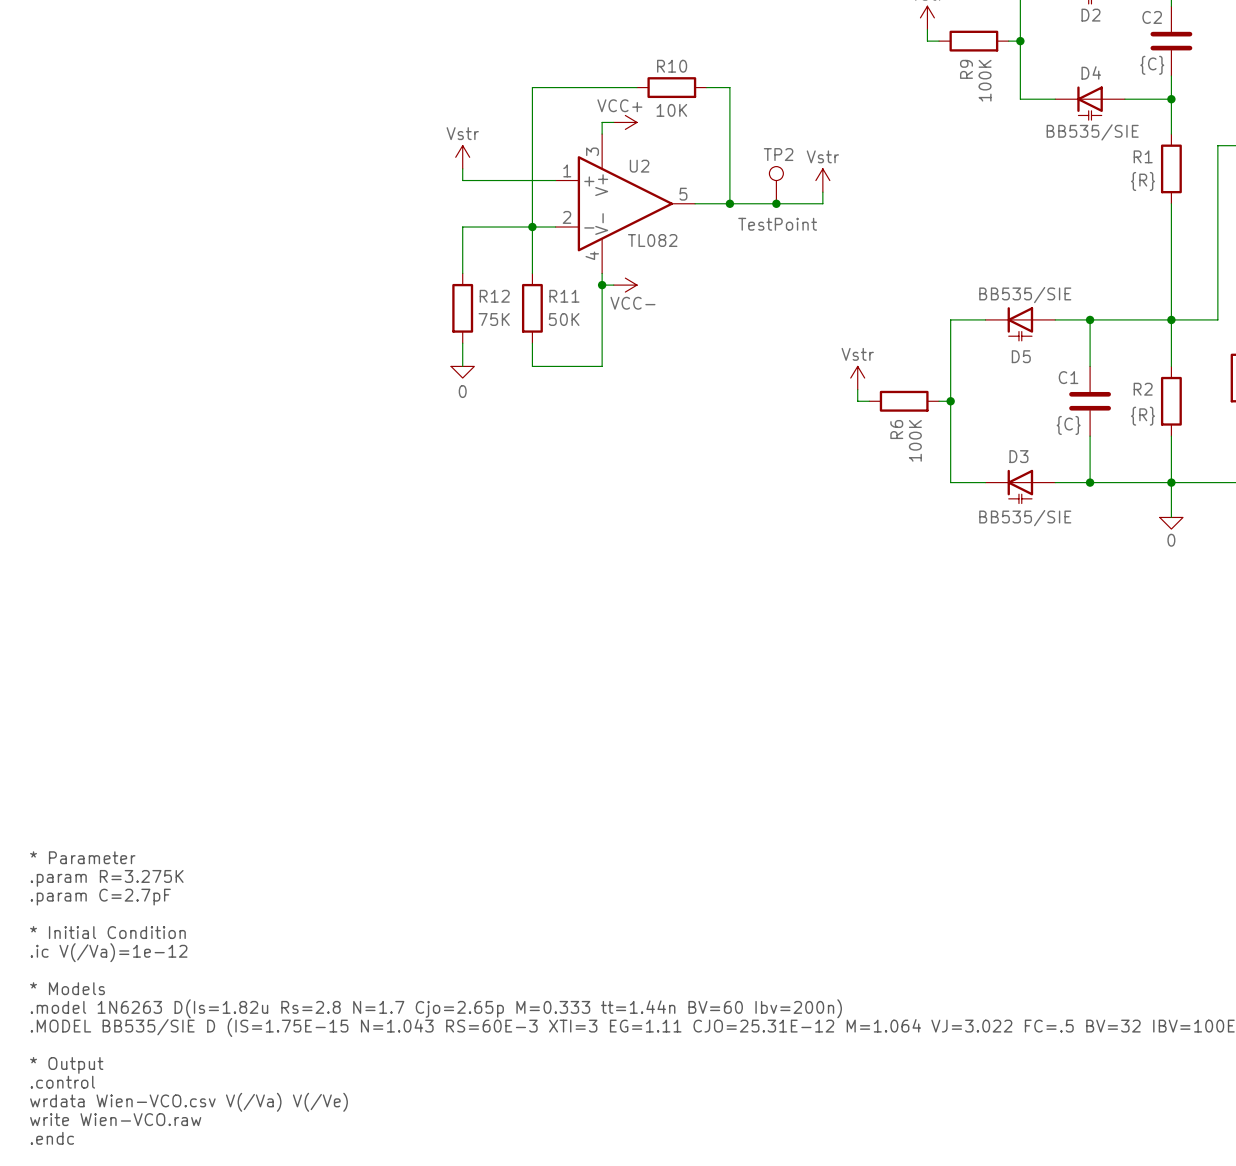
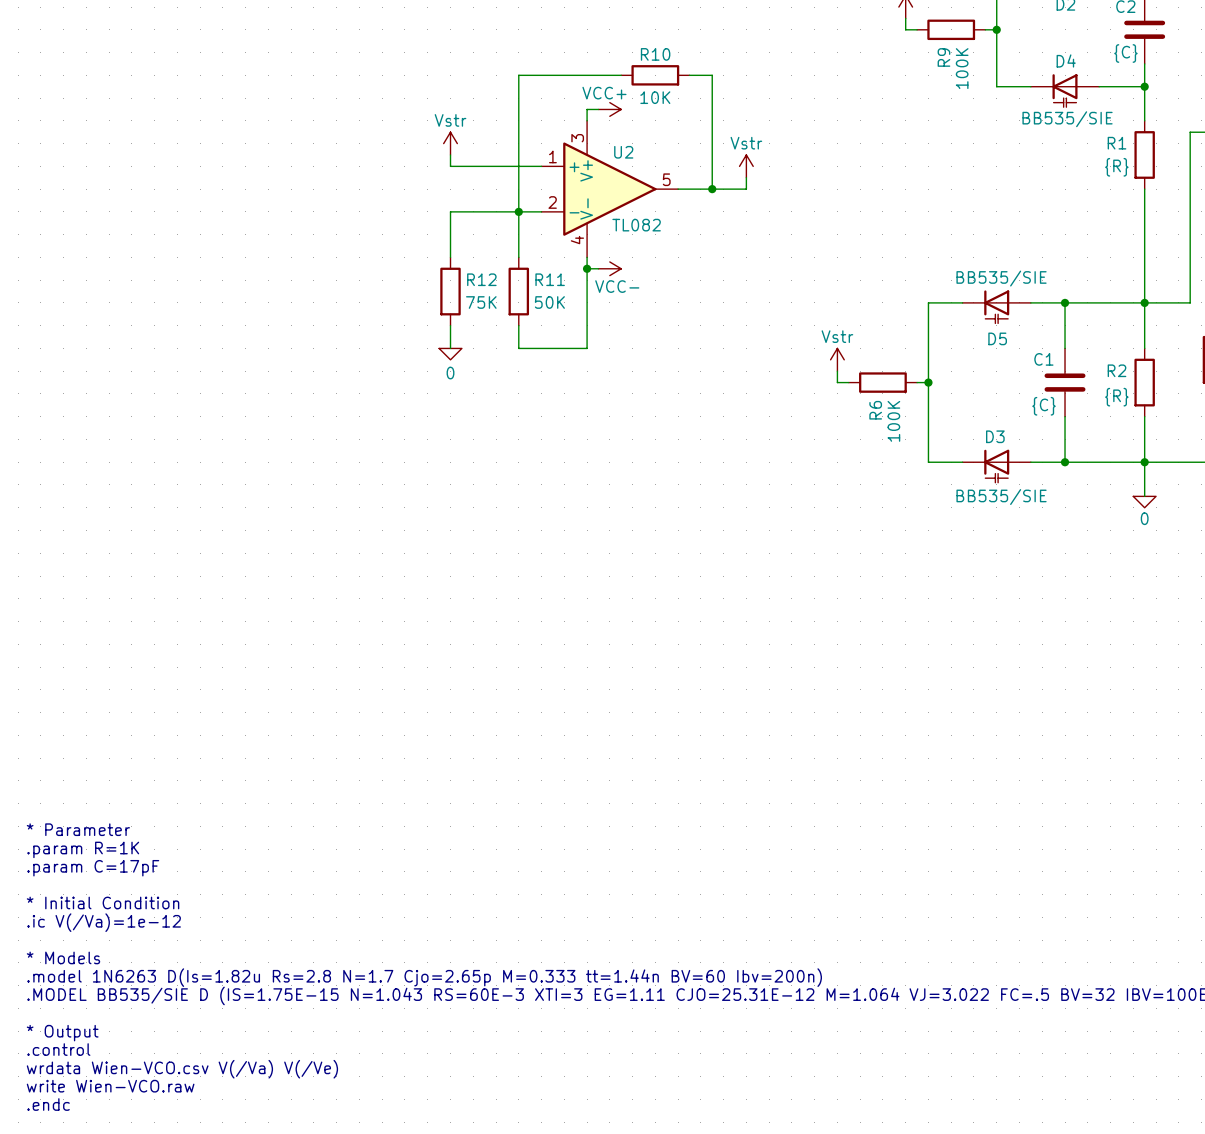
power symbol position: Vstr (822, 180) -> Vstr (746, 166)
TP2: TestPoint (776, 185) -> none
wire: (822, 192) (822, 203) (764, 203) -> (746, 177) (746, 189)
junction: (776, 203) -> none
text: .param R=3.275K (107, 878) -> .param R=1K (83, 849)
text: .param C=2.7pF (100, 897) -> .param C=17pF (93, 868)

